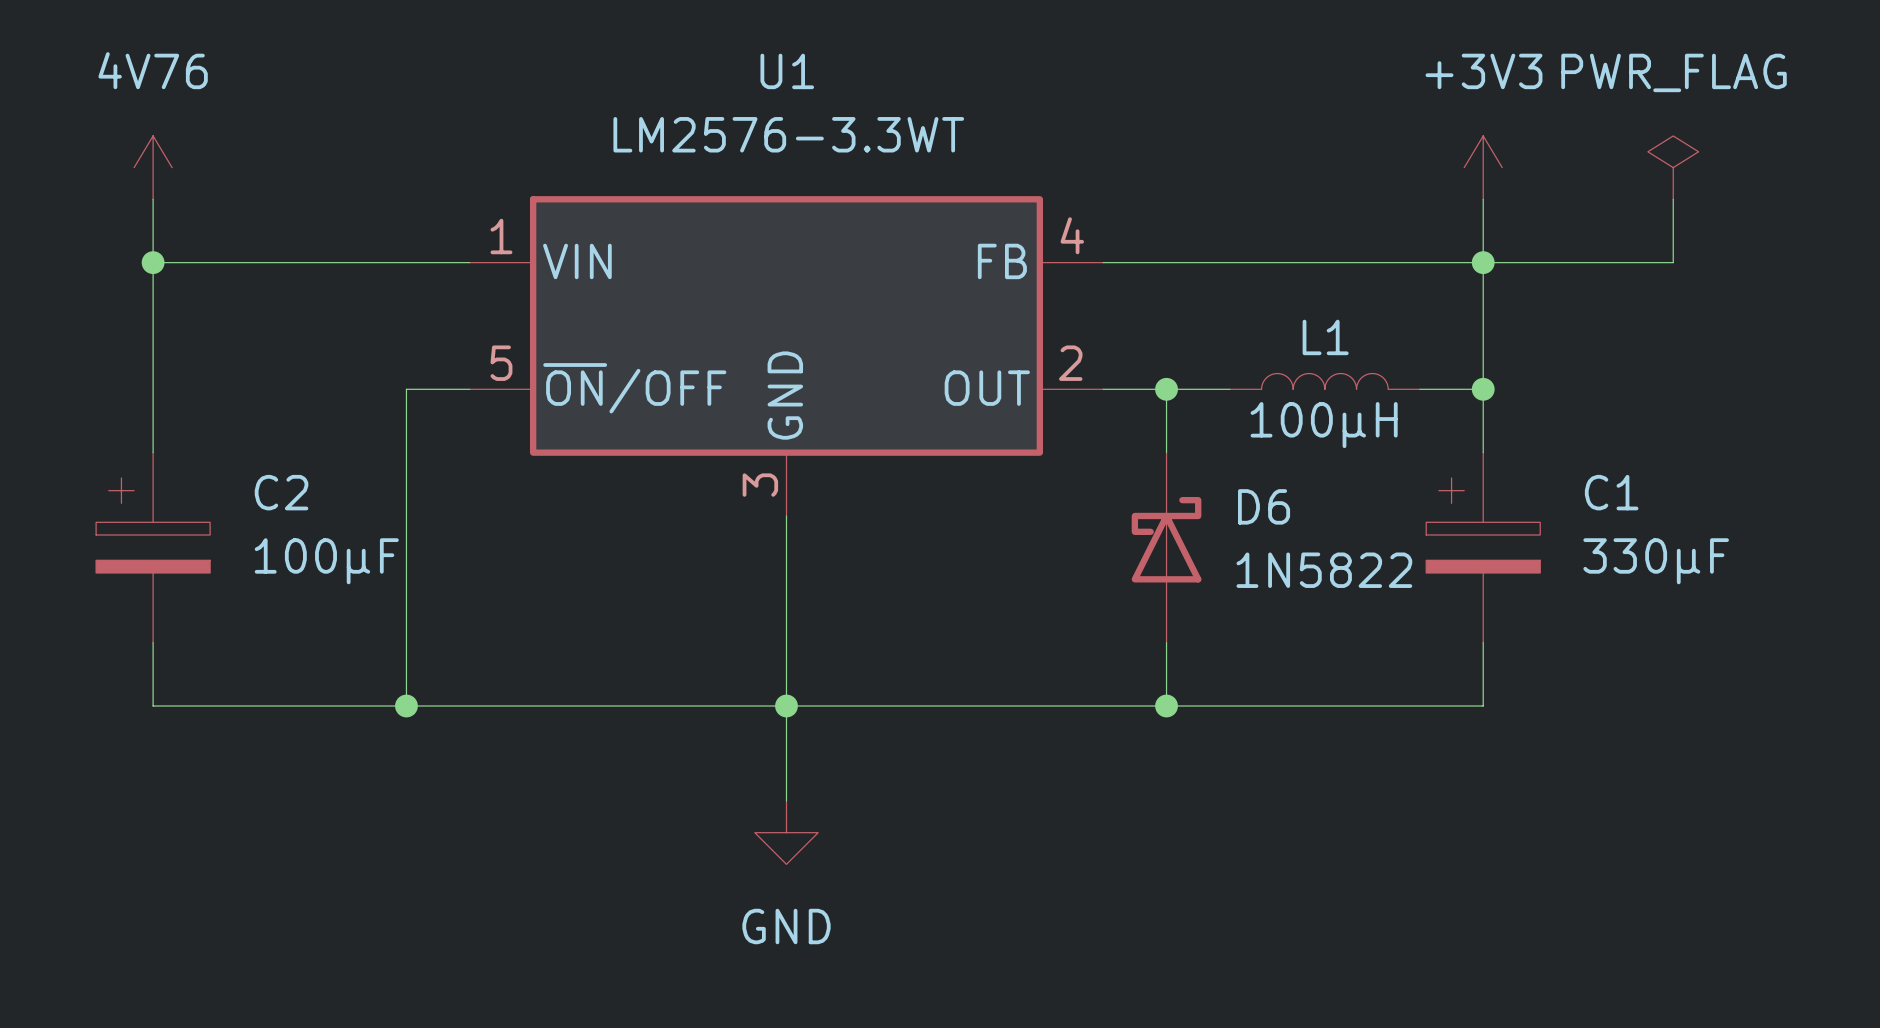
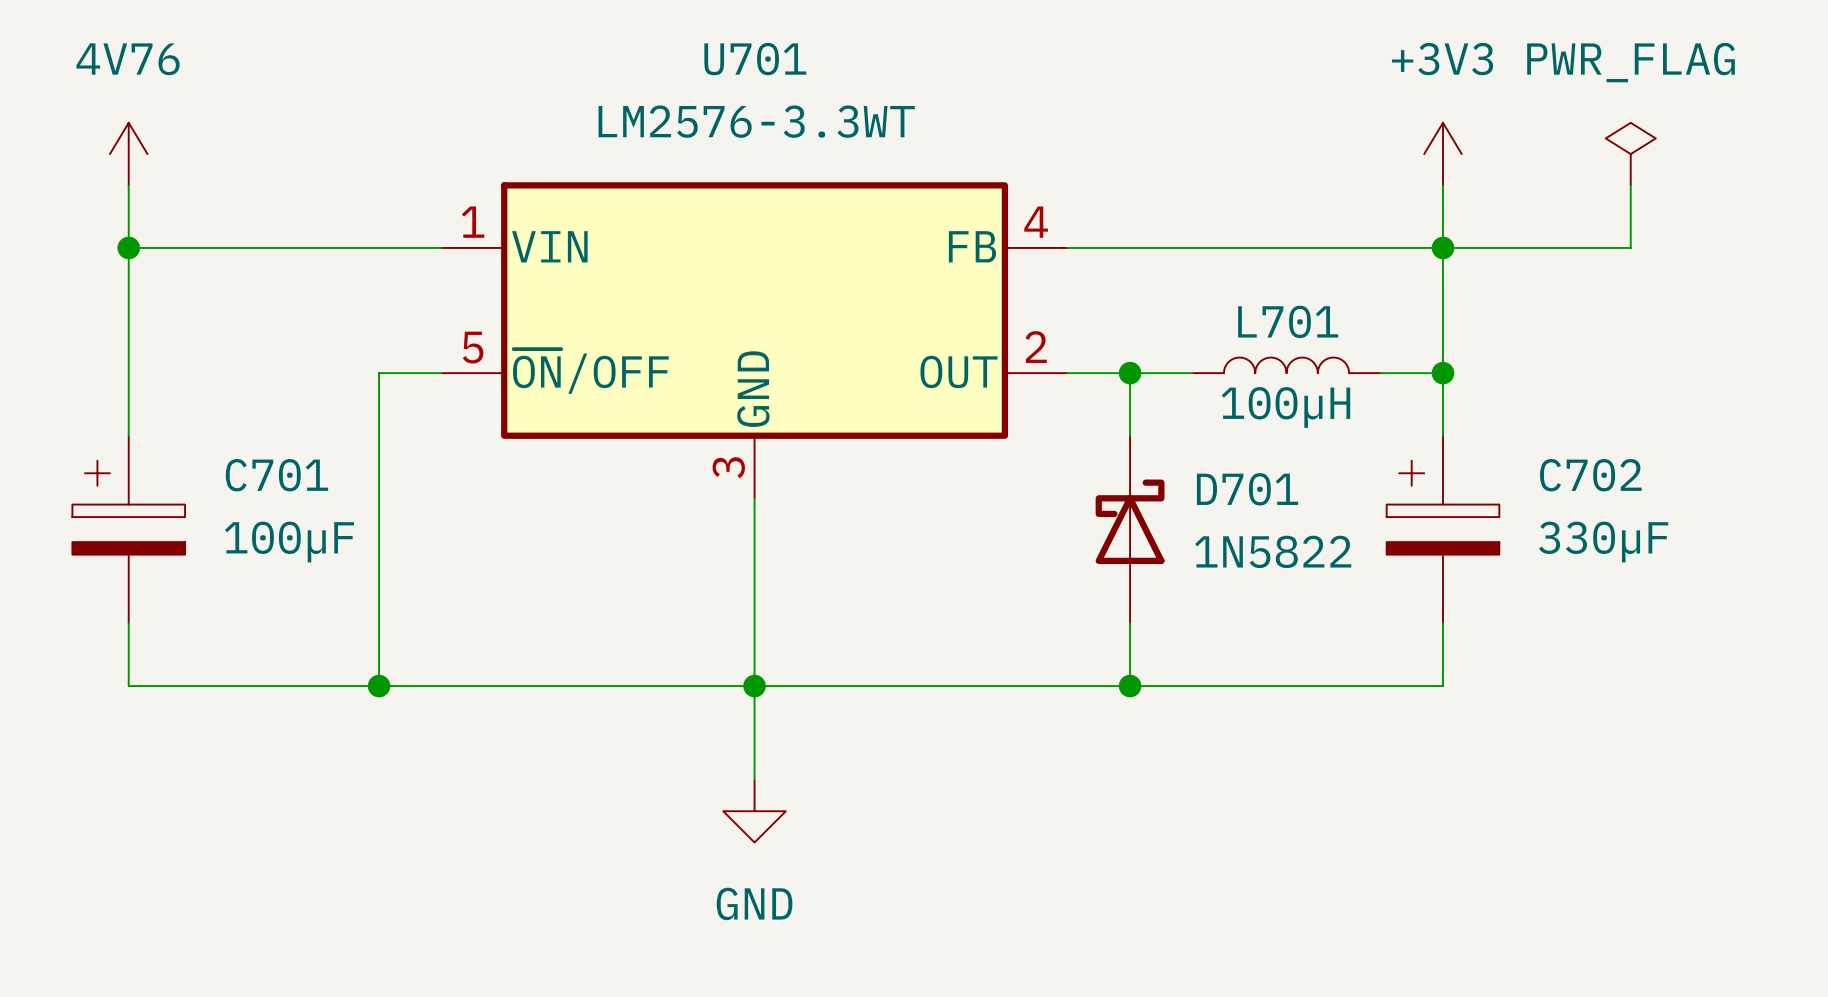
U1 name: U1 (787, 71) -> U701 (755, 59)
L1 name: L1 (1325, 337) -> L701 (1288, 321)
C2 name: C2 (281, 492) -> C701 (276, 475)
C1 name: C1 (1611, 492) -> C702 (1590, 475)
D6 name: D6 (1264, 506) -> D701 (1247, 489)

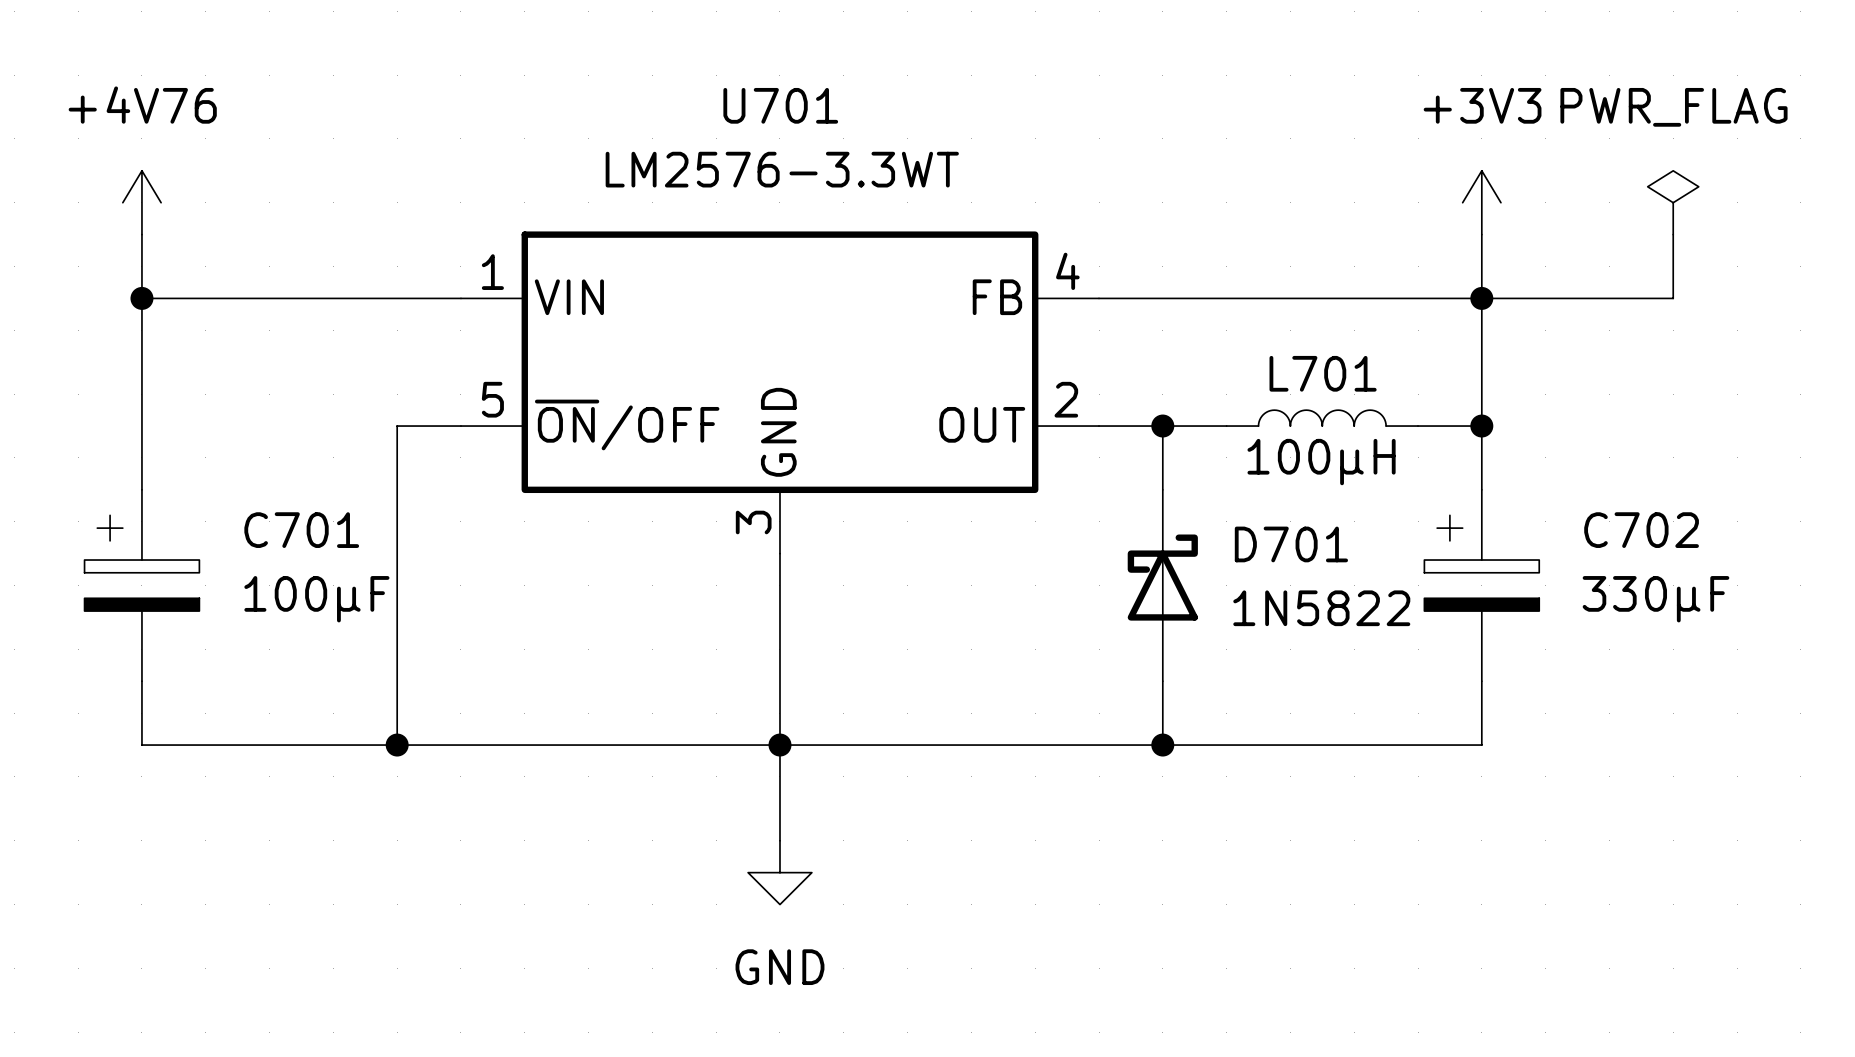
power symbol: 4V76 (128, 154) -> +4V76 (141, 202)

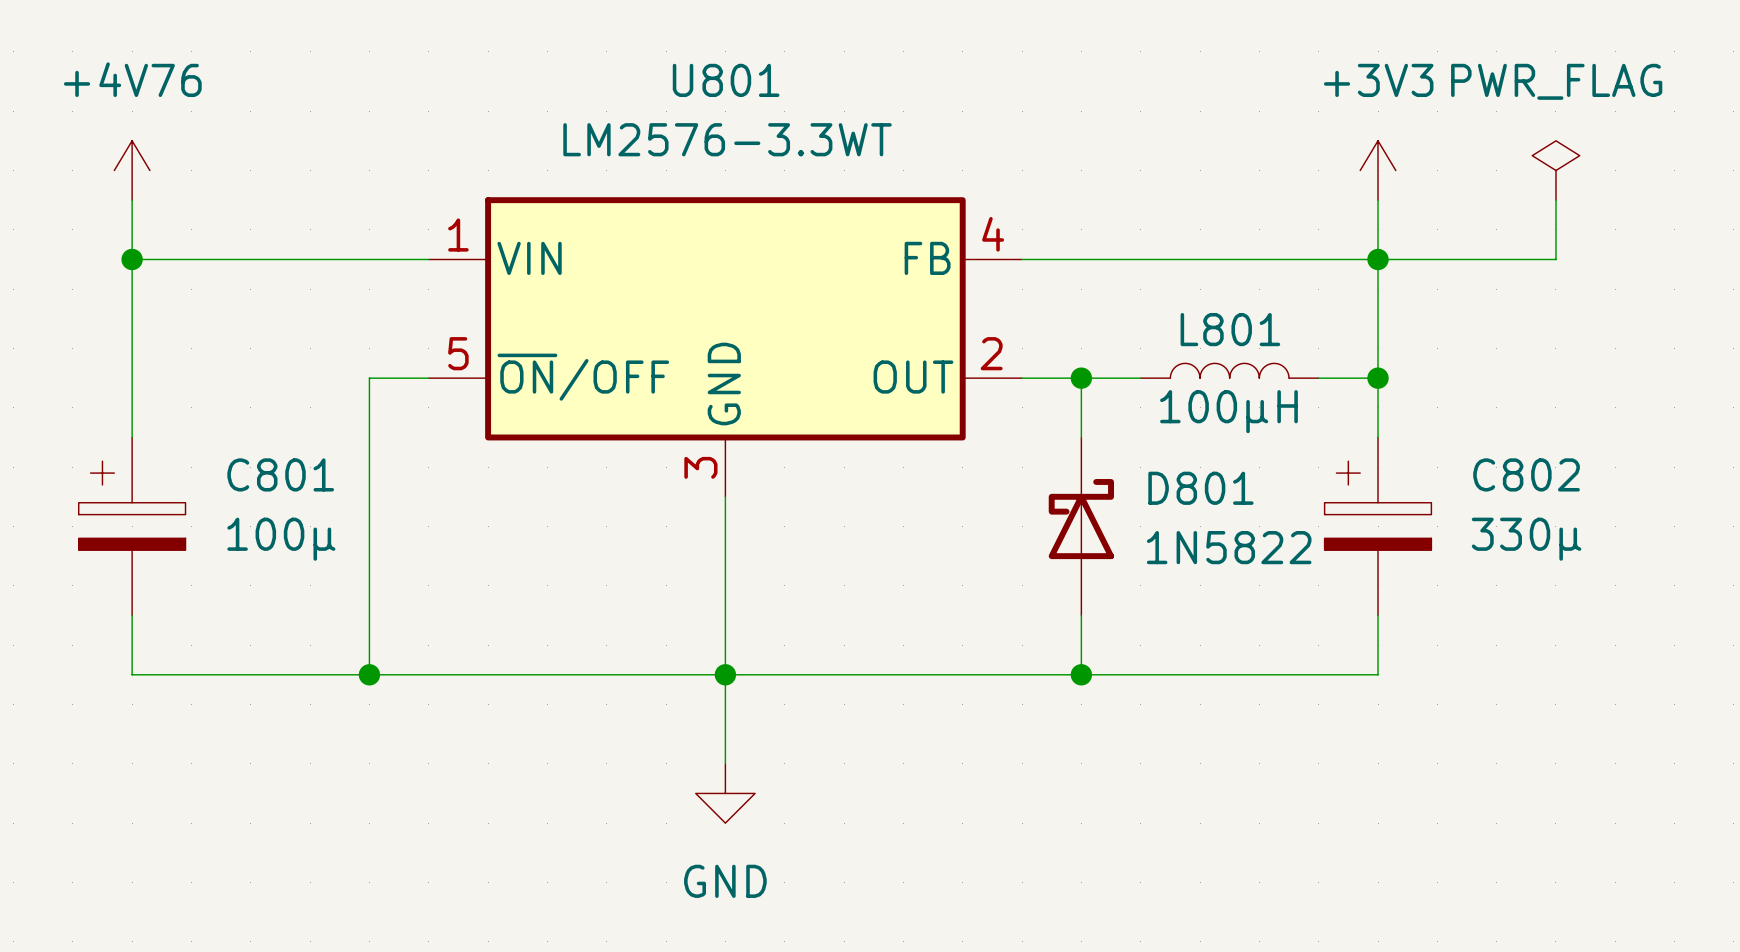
U701 name: U701 (780, 105) -> U801 (726, 80)
L701 name: L701 (1323, 373) -> L801 (1230, 329)
C701 name: C701 (301, 530) -> C801 (280, 474)
C702 name: C702 (1641, 530) -> C802 (1526, 474)
D701 name: D701 (1291, 544) -> D801 (1200, 488)
C701 value: 100µF (316, 599) -> 100µ (281, 539)
C702 value: 330µF (1655, 599) -> 330µ (1526, 539)

